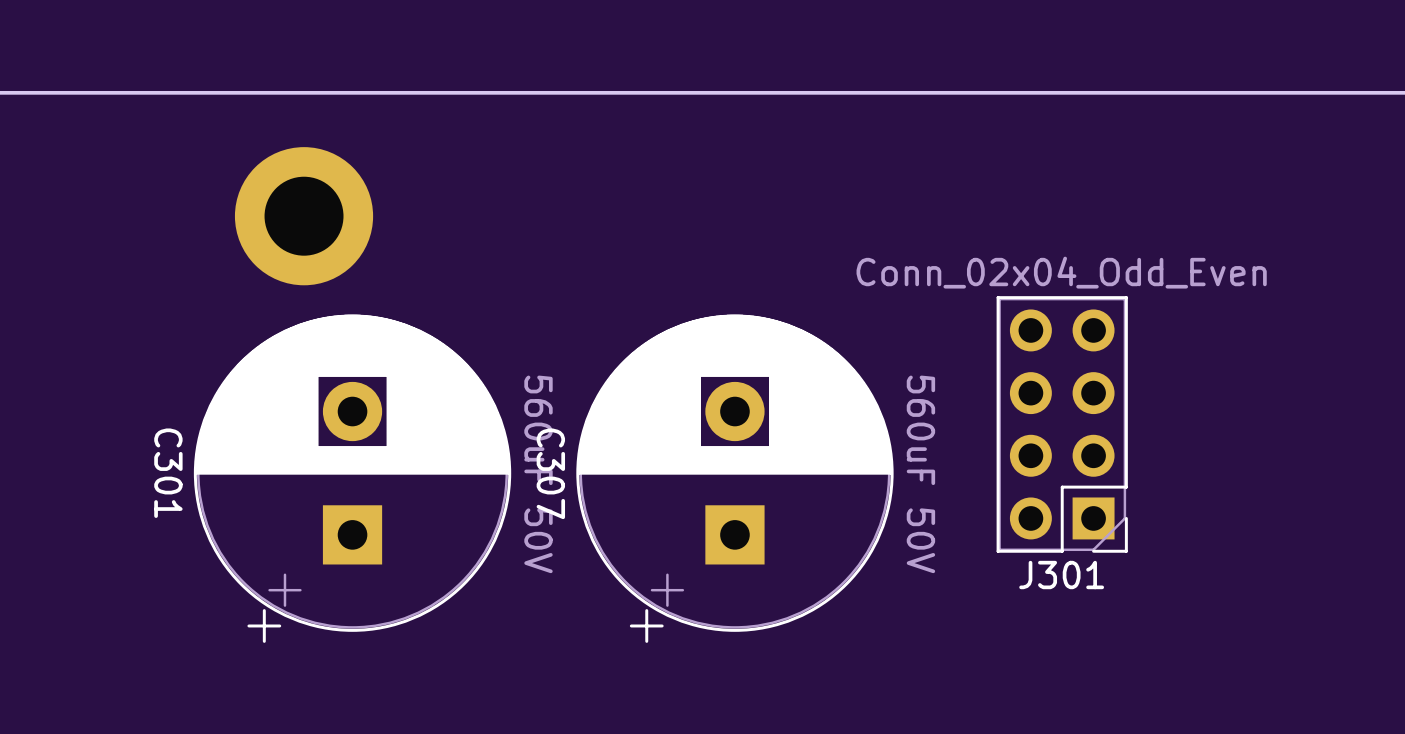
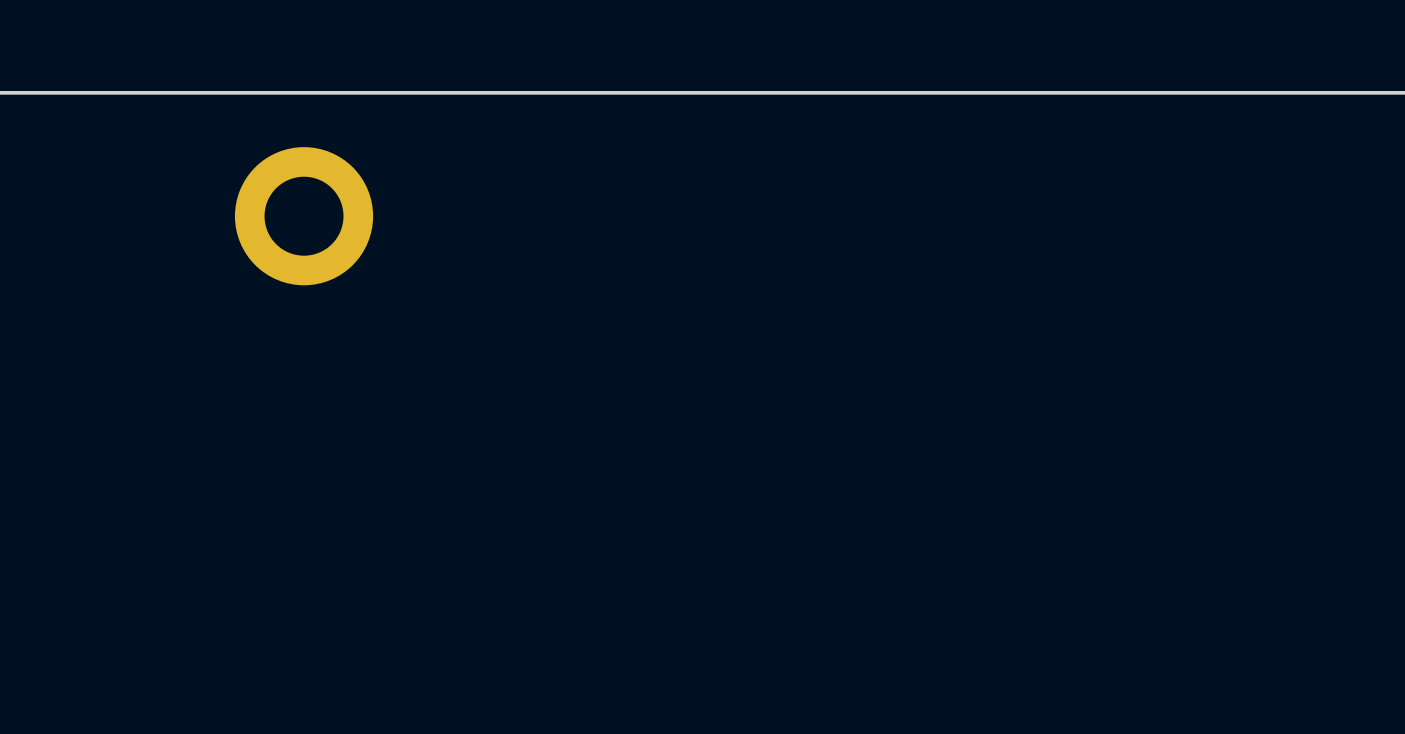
J301: Conn_02x04_Odd_Even (1062, 424) -> none
C301: 560uF 50V (352, 478) -> none
C307: 560uF 50V (734, 478) -> none

